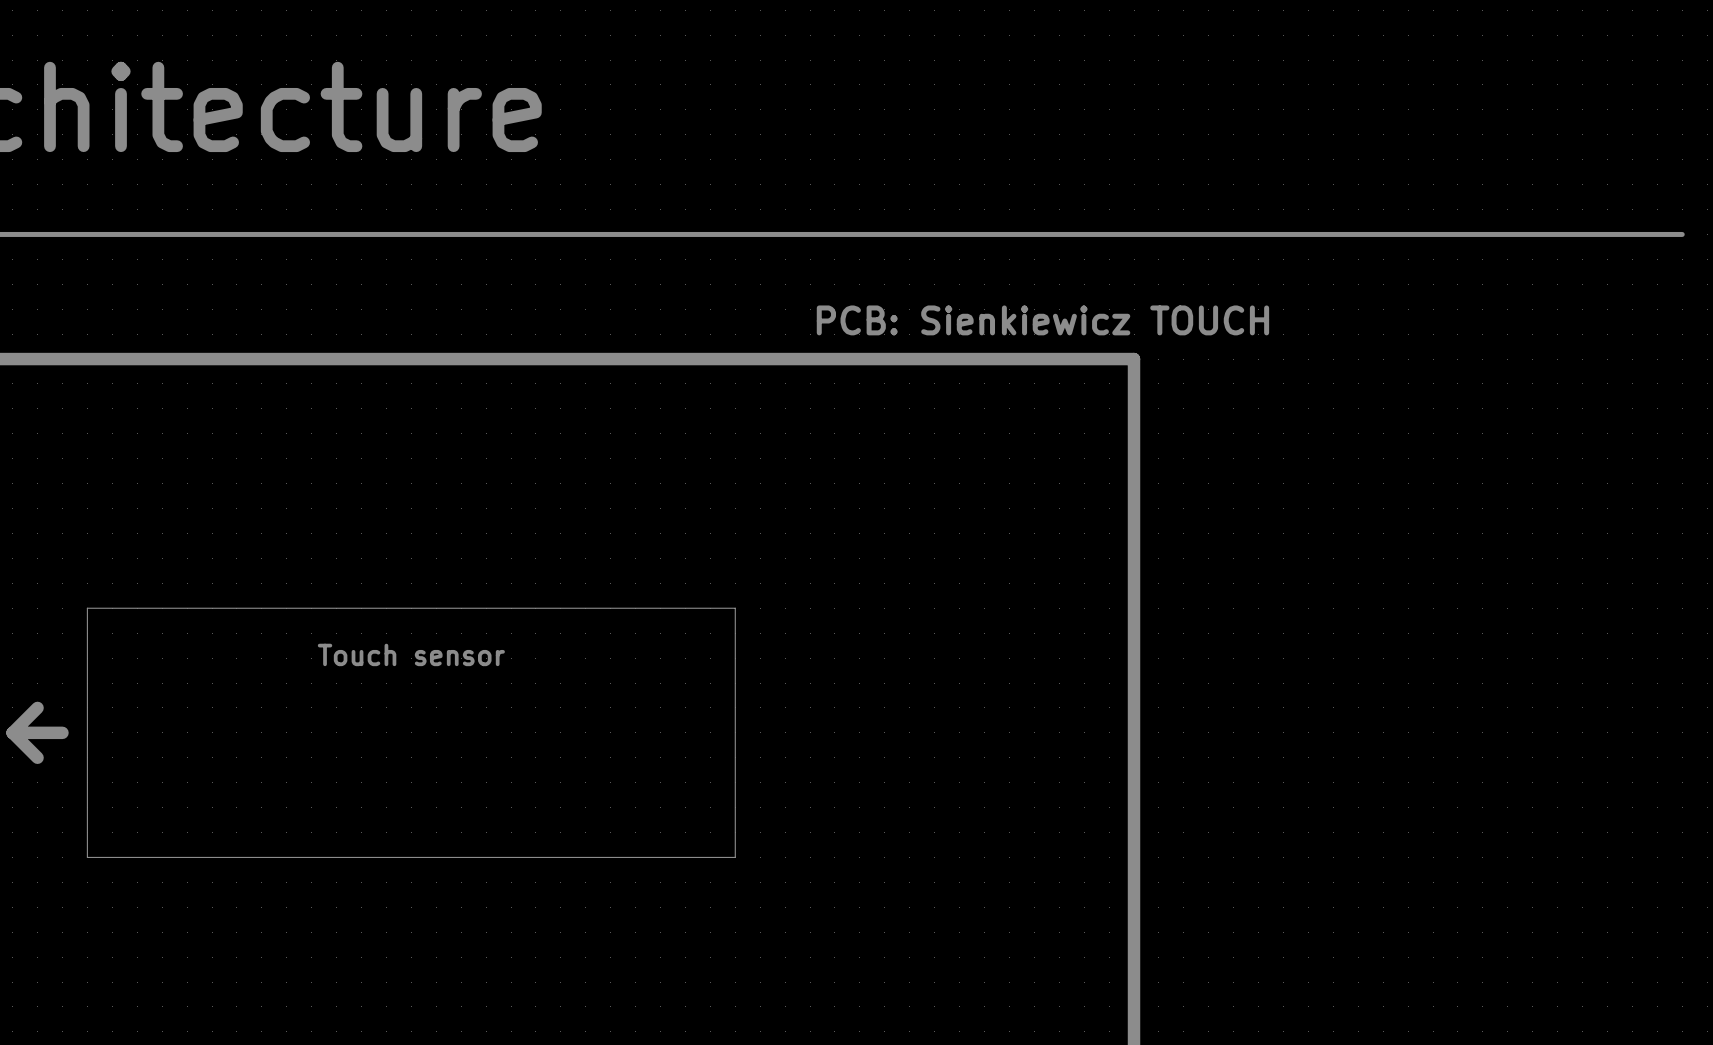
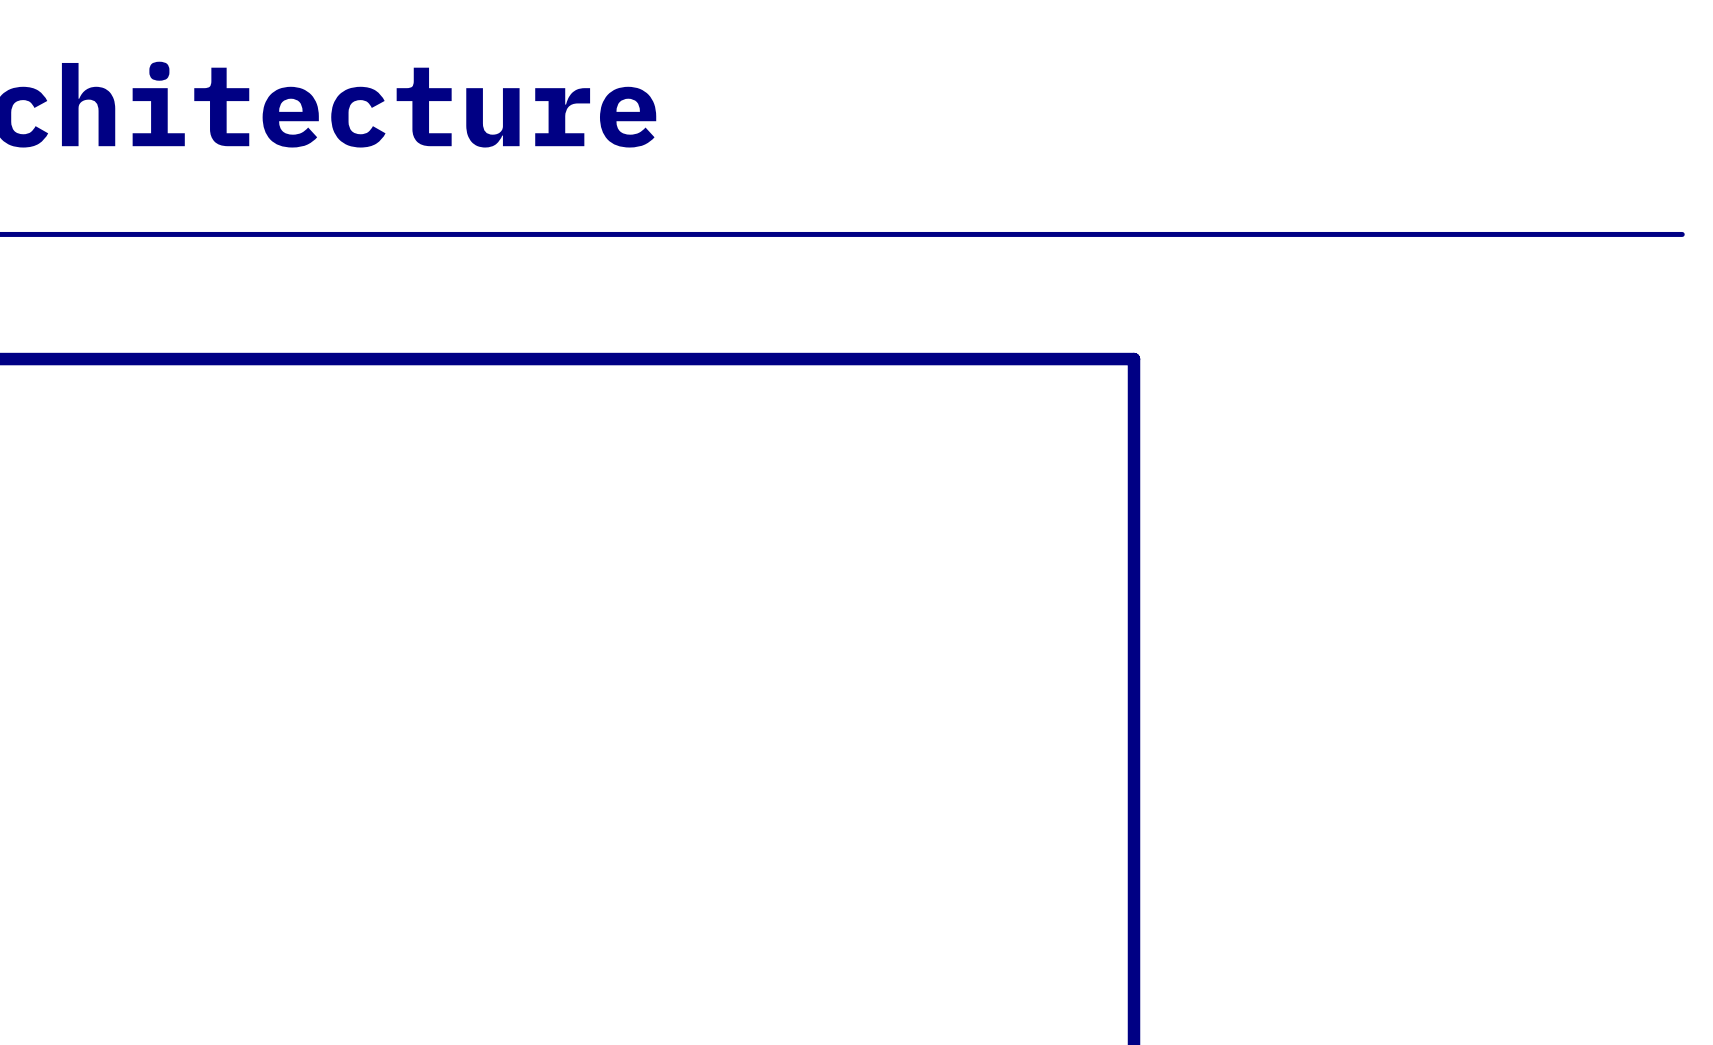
text: PCB: Sienkiewicz TOUCH (1042, 320) -> none
line: (87, 608) (735, 608) (735, 857) (87, 857) (87, 608) -> none
text: Touch sensor (411, 654) -> none
line: (37, 707) (12, 732) -> none
line: (12, 732) (62, 732) -> none
line: (12, 732) (37, 757) -> none

